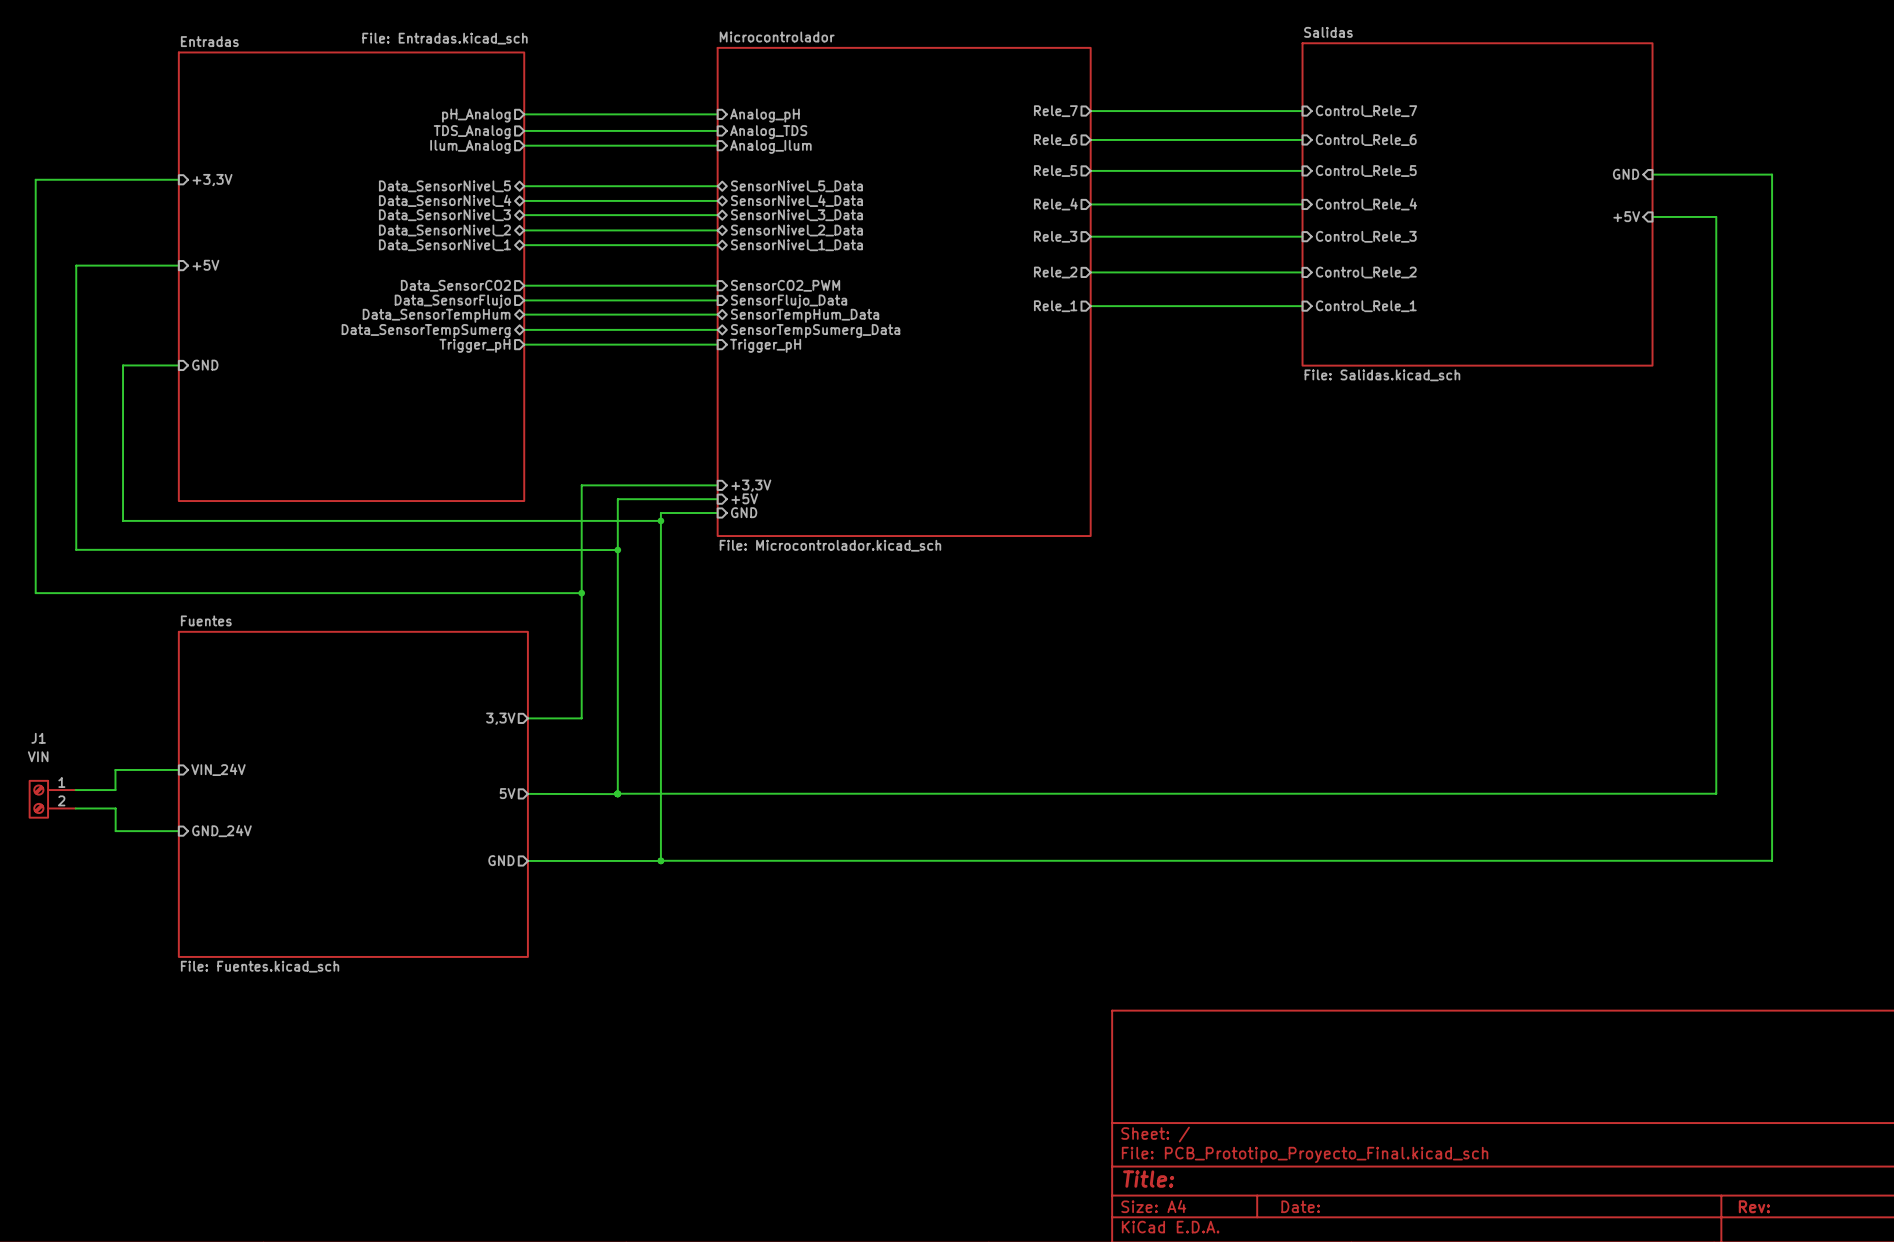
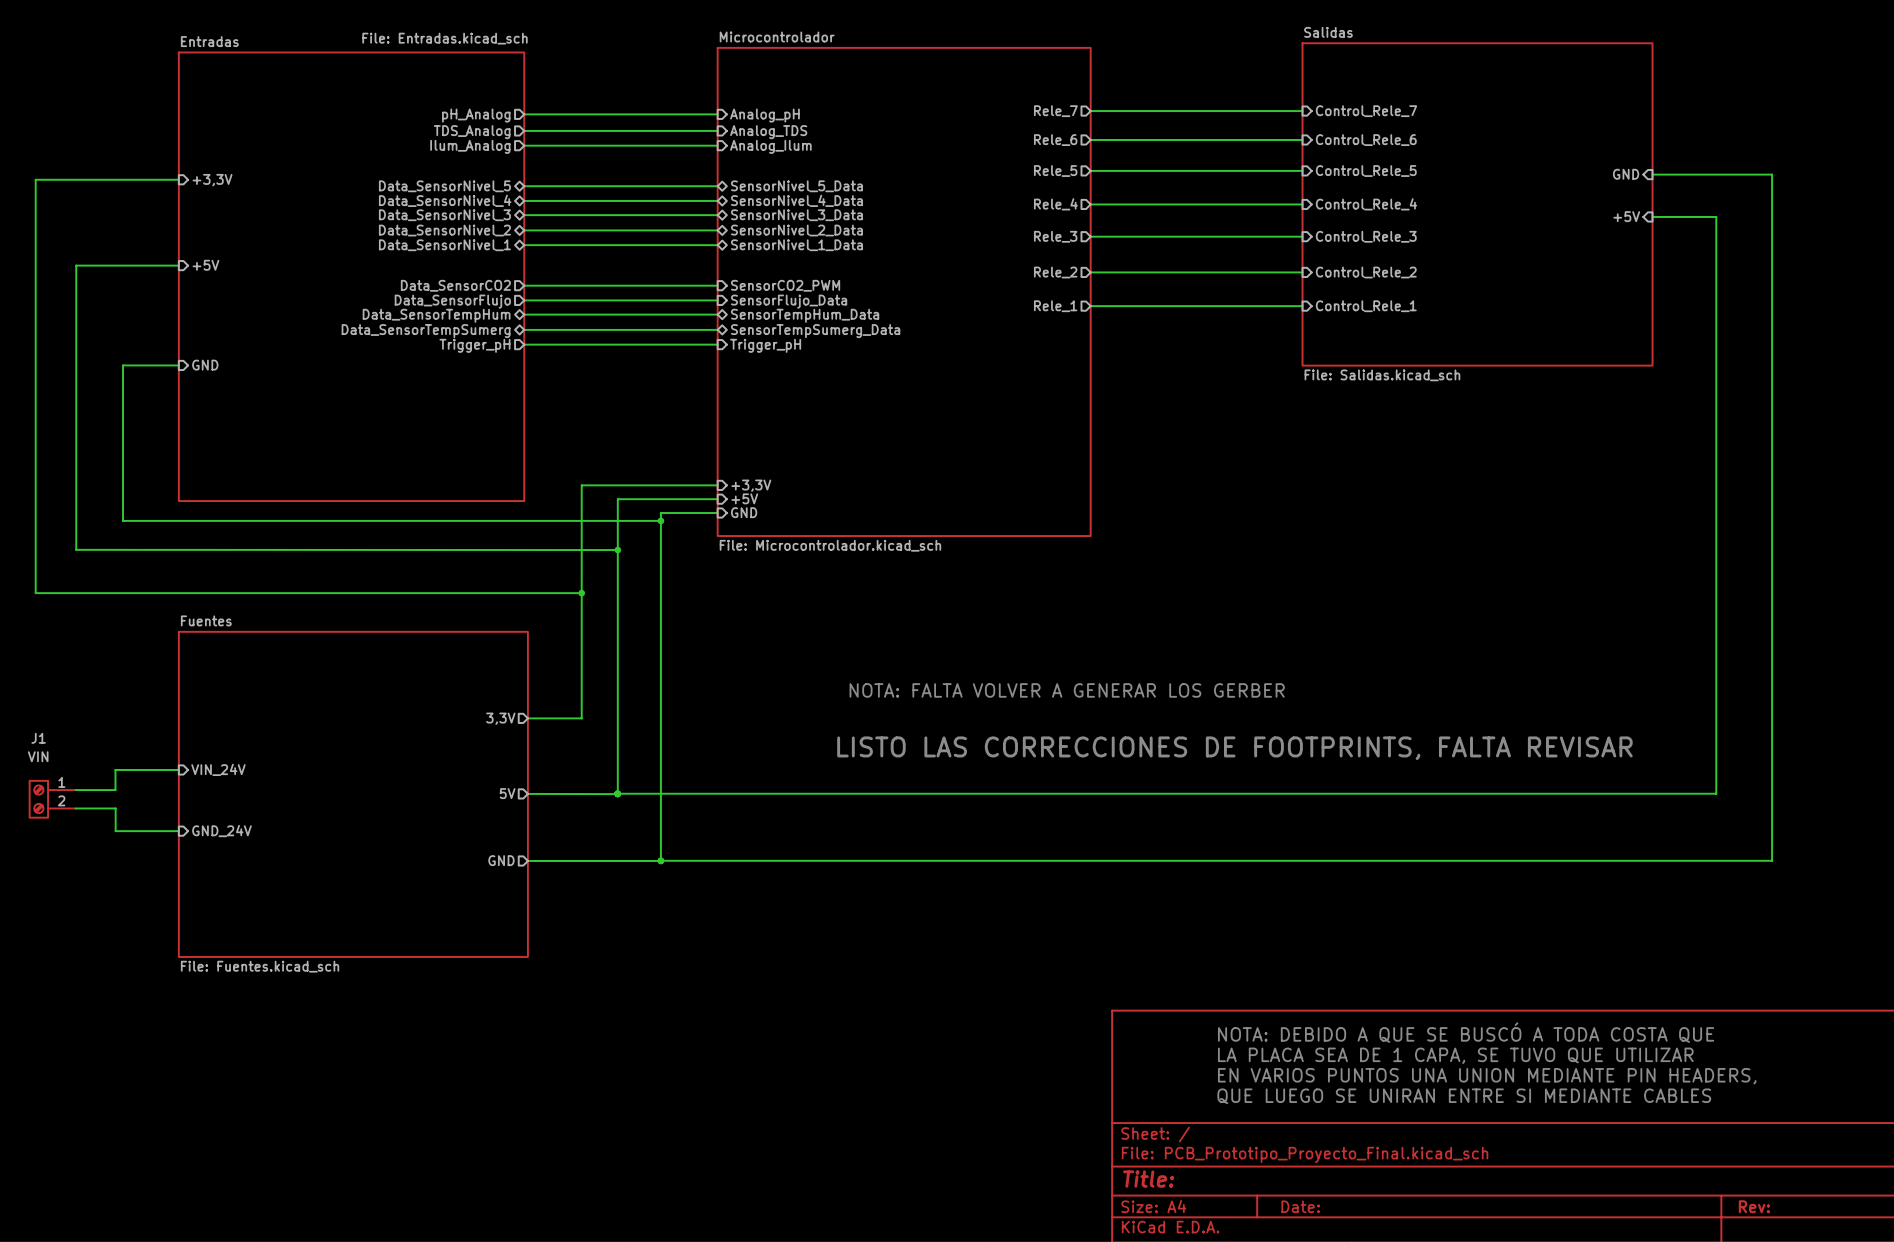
text: none -> NOTA: FALTA VOLVER A GENERAR LOS GERBER (1067, 690)
text: none -> LISTO LAS CORRECCIONES DE FOOTPRINTS, FALTA REVISAR (1234, 748)
text: none -> NOTA: DEBIDO A QUE SE BUSCÓ A TODA COSTA QUE (1466, 1032)
text: none -> LA PLACA SEA DE 1 CAPA, SE TUVO QUE UTILIZAR (1455, 1055)
text: none -> EN VARIOS PUNTOS UNA UNION MEDIANTE PIN HEADERS, (1487, 1076)
text: none -> QUE LUEGO SE UNIRAN ENTRE SI MEDIANTE CABLES (1464, 1096)

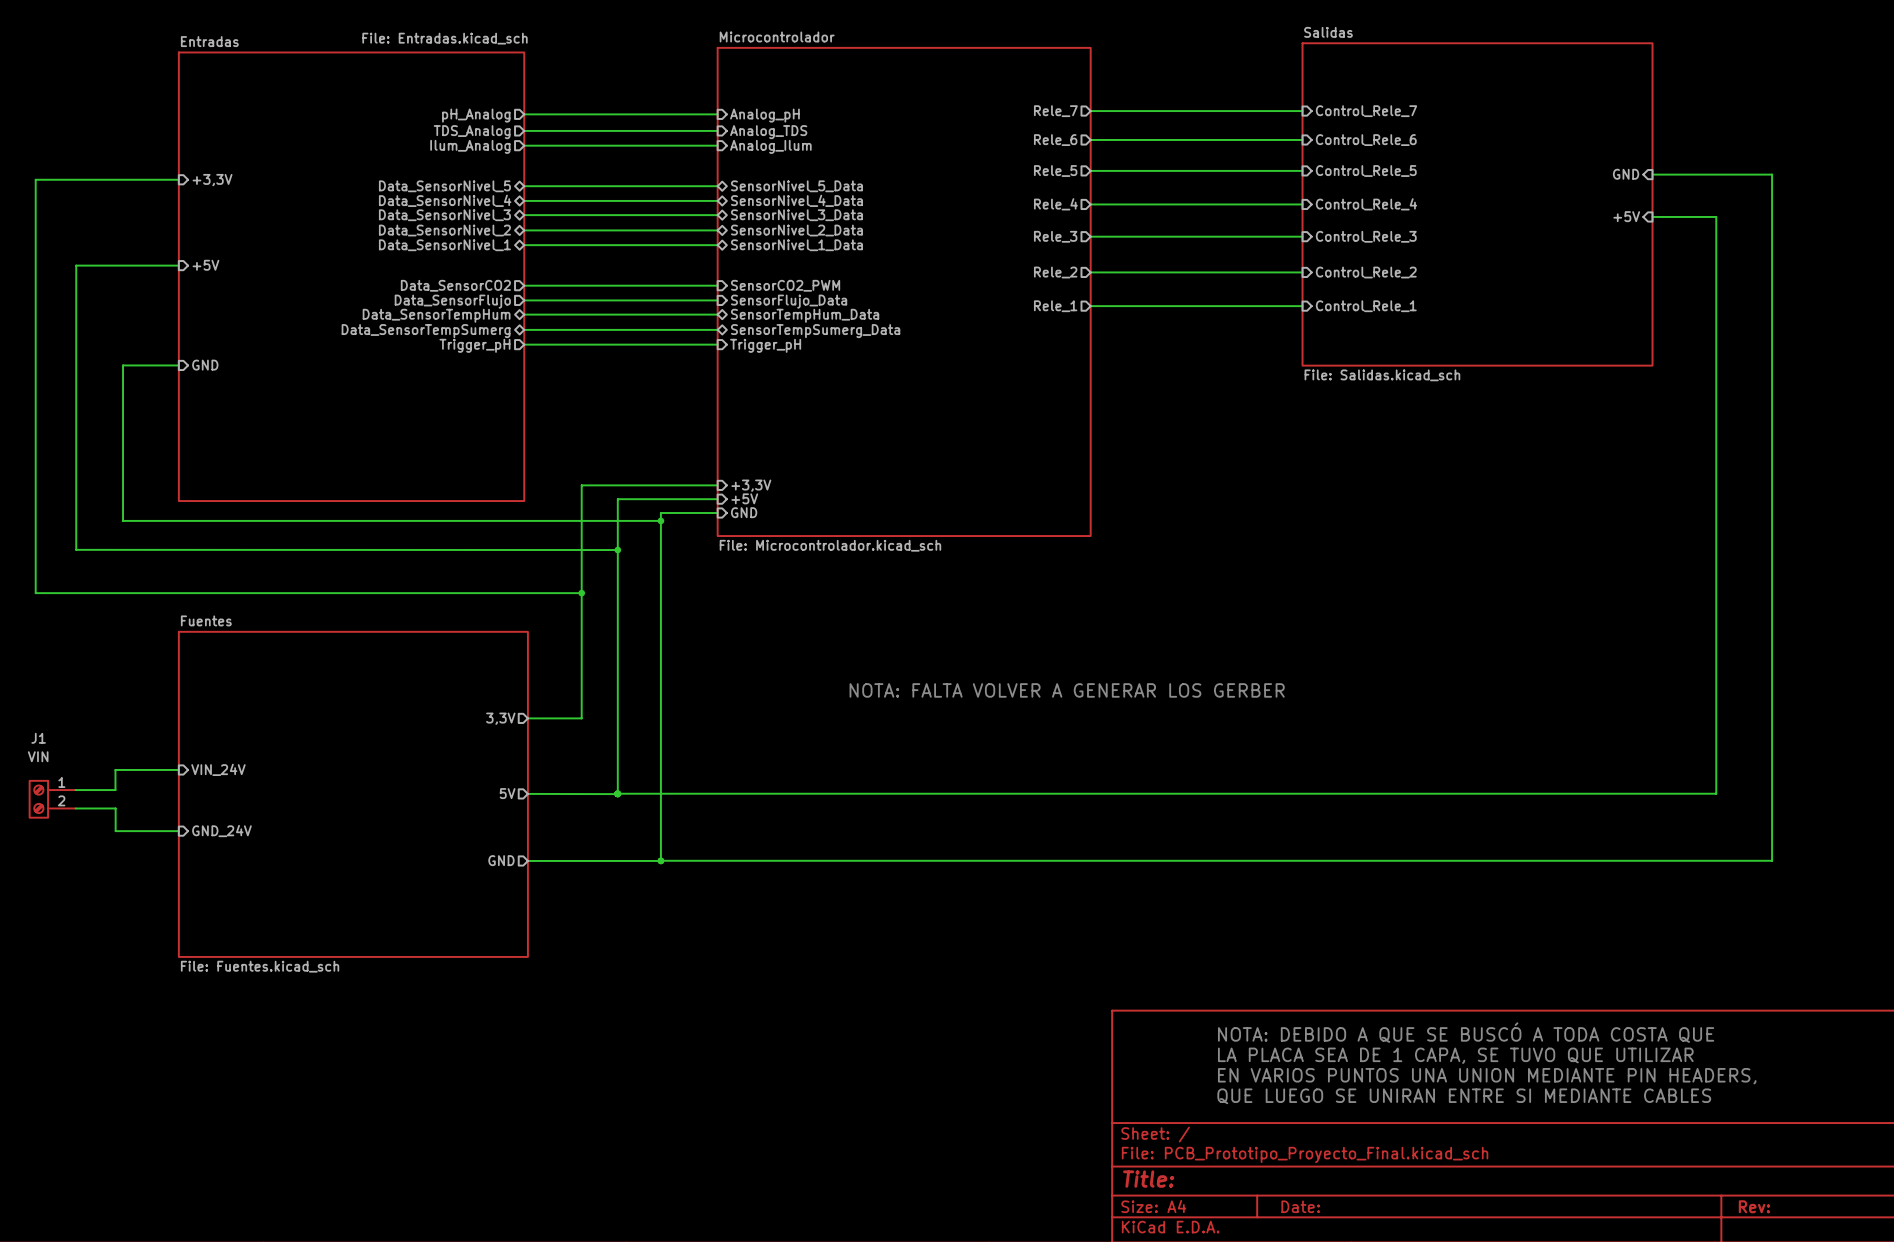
text: LISTO LAS CORRECCIONES DE FOOTPRINTS, FALTA REVISAR (1234, 748) -> none

